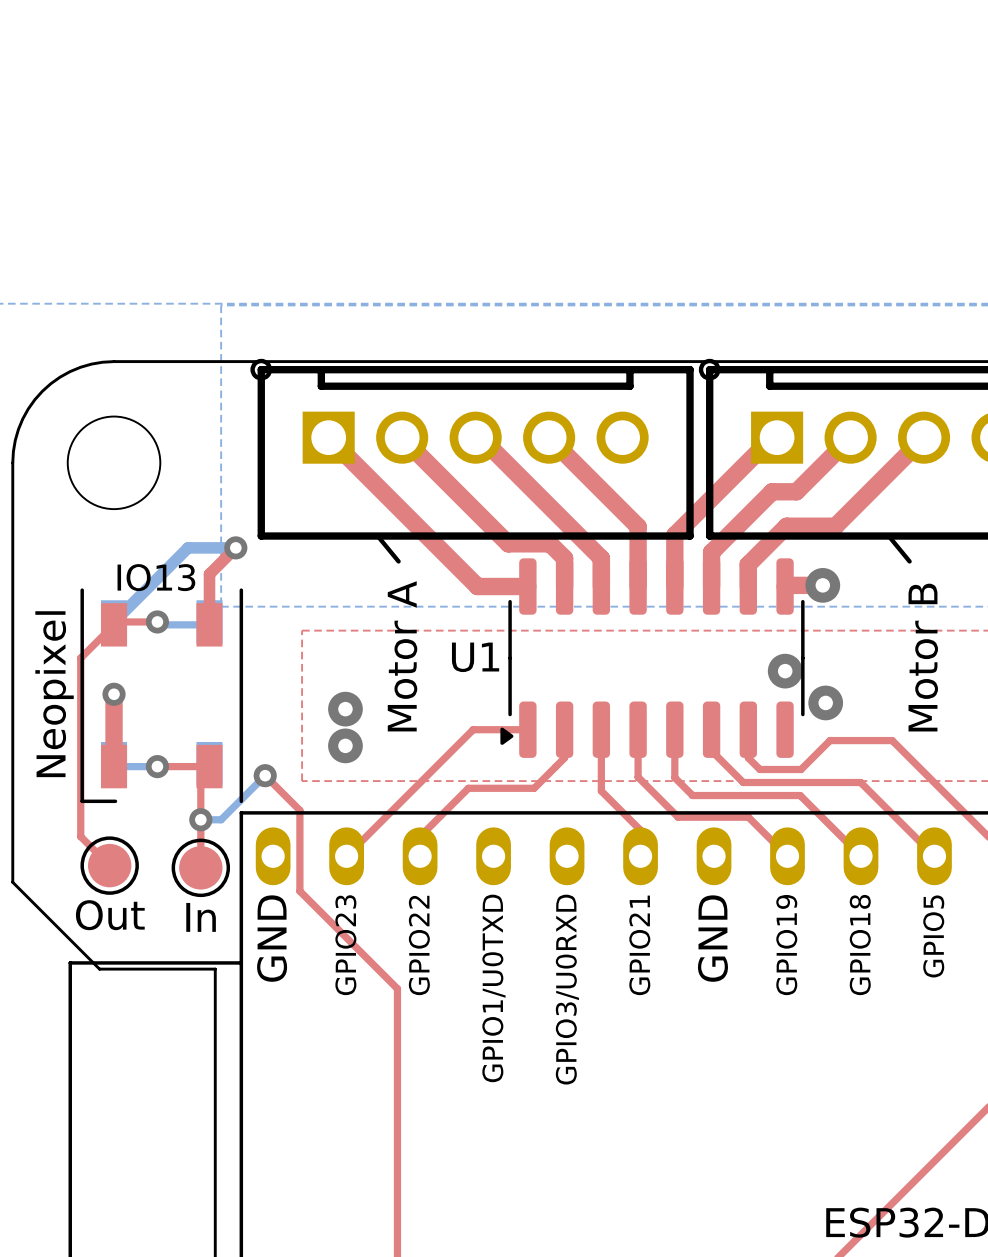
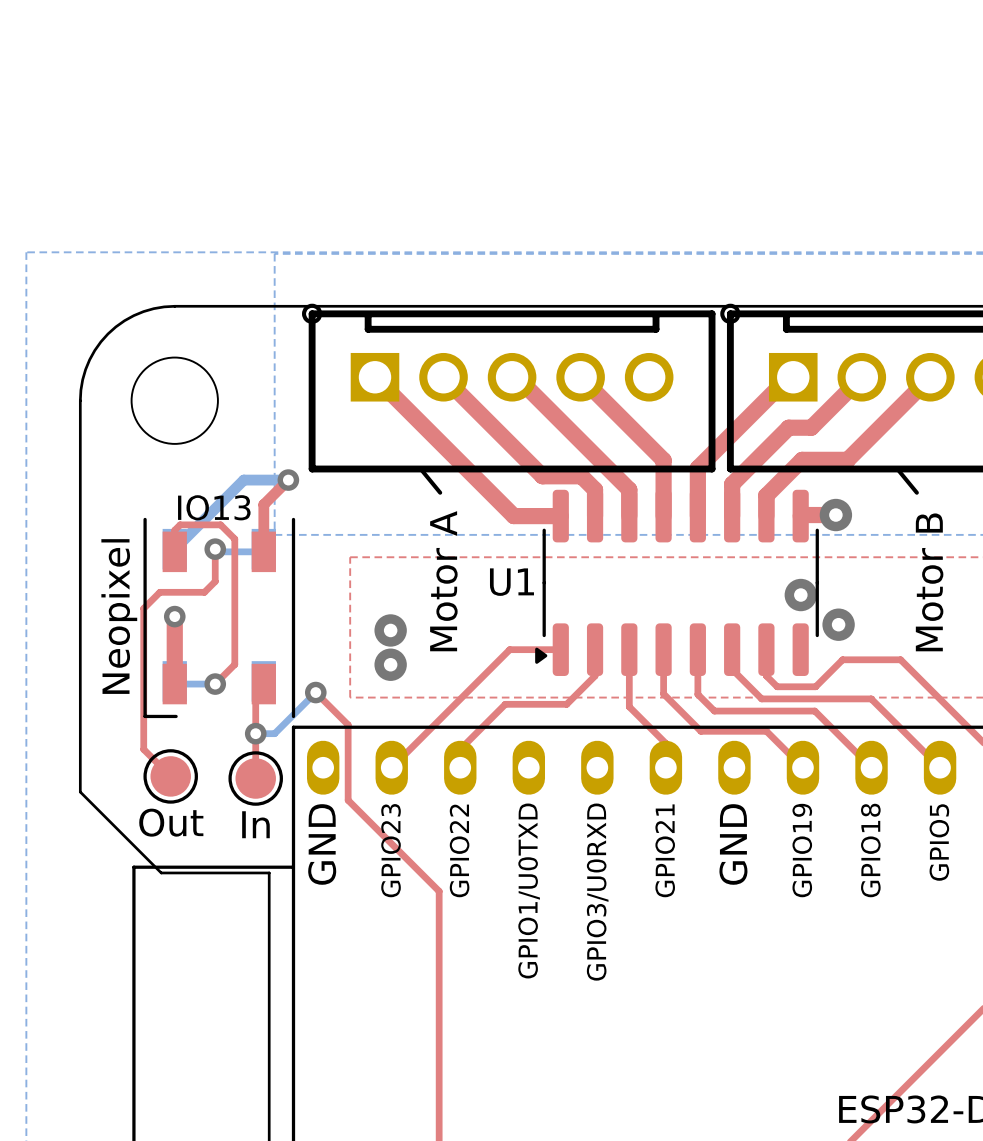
top track: (157, 621) (116, 621) (80, 658) (80, 685) -> (215, 549) (215, 581) (204, 592) (159, 592) (143, 608)
top track: (157, 766) (209, 766) -> (215, 684) (234, 664) (234, 539) (220, 524) (180, 524) (174, 530) (174, 551)

